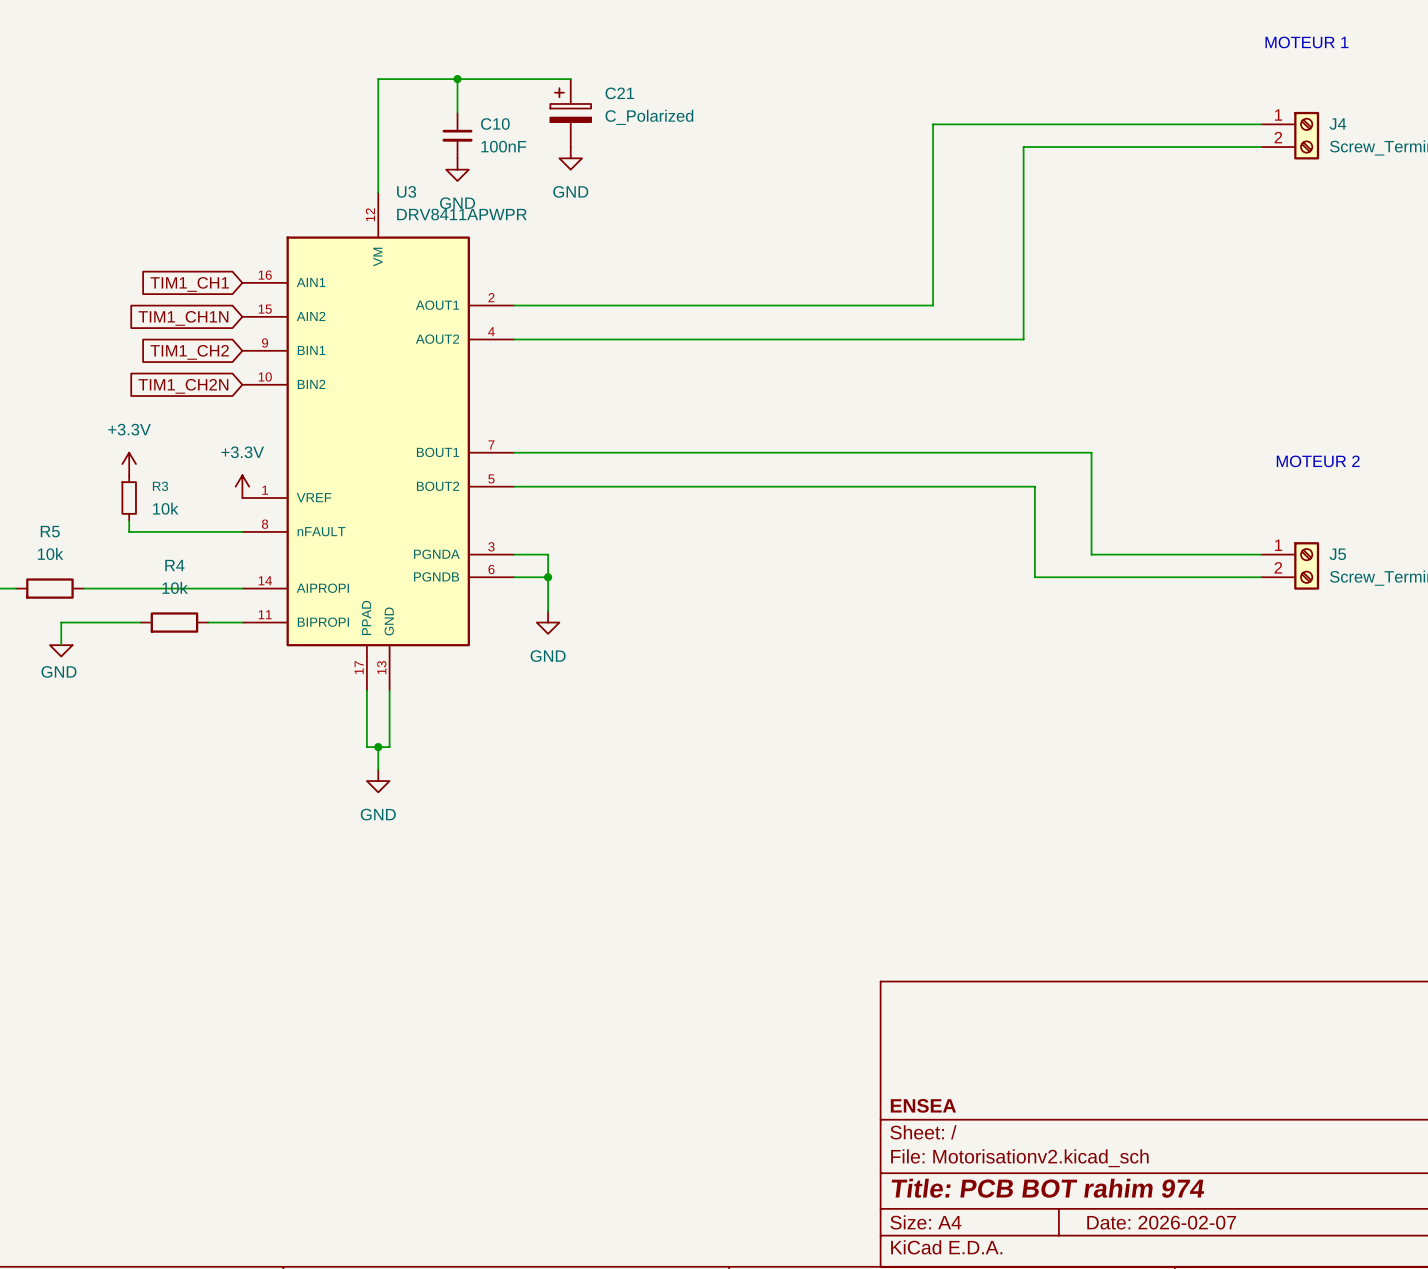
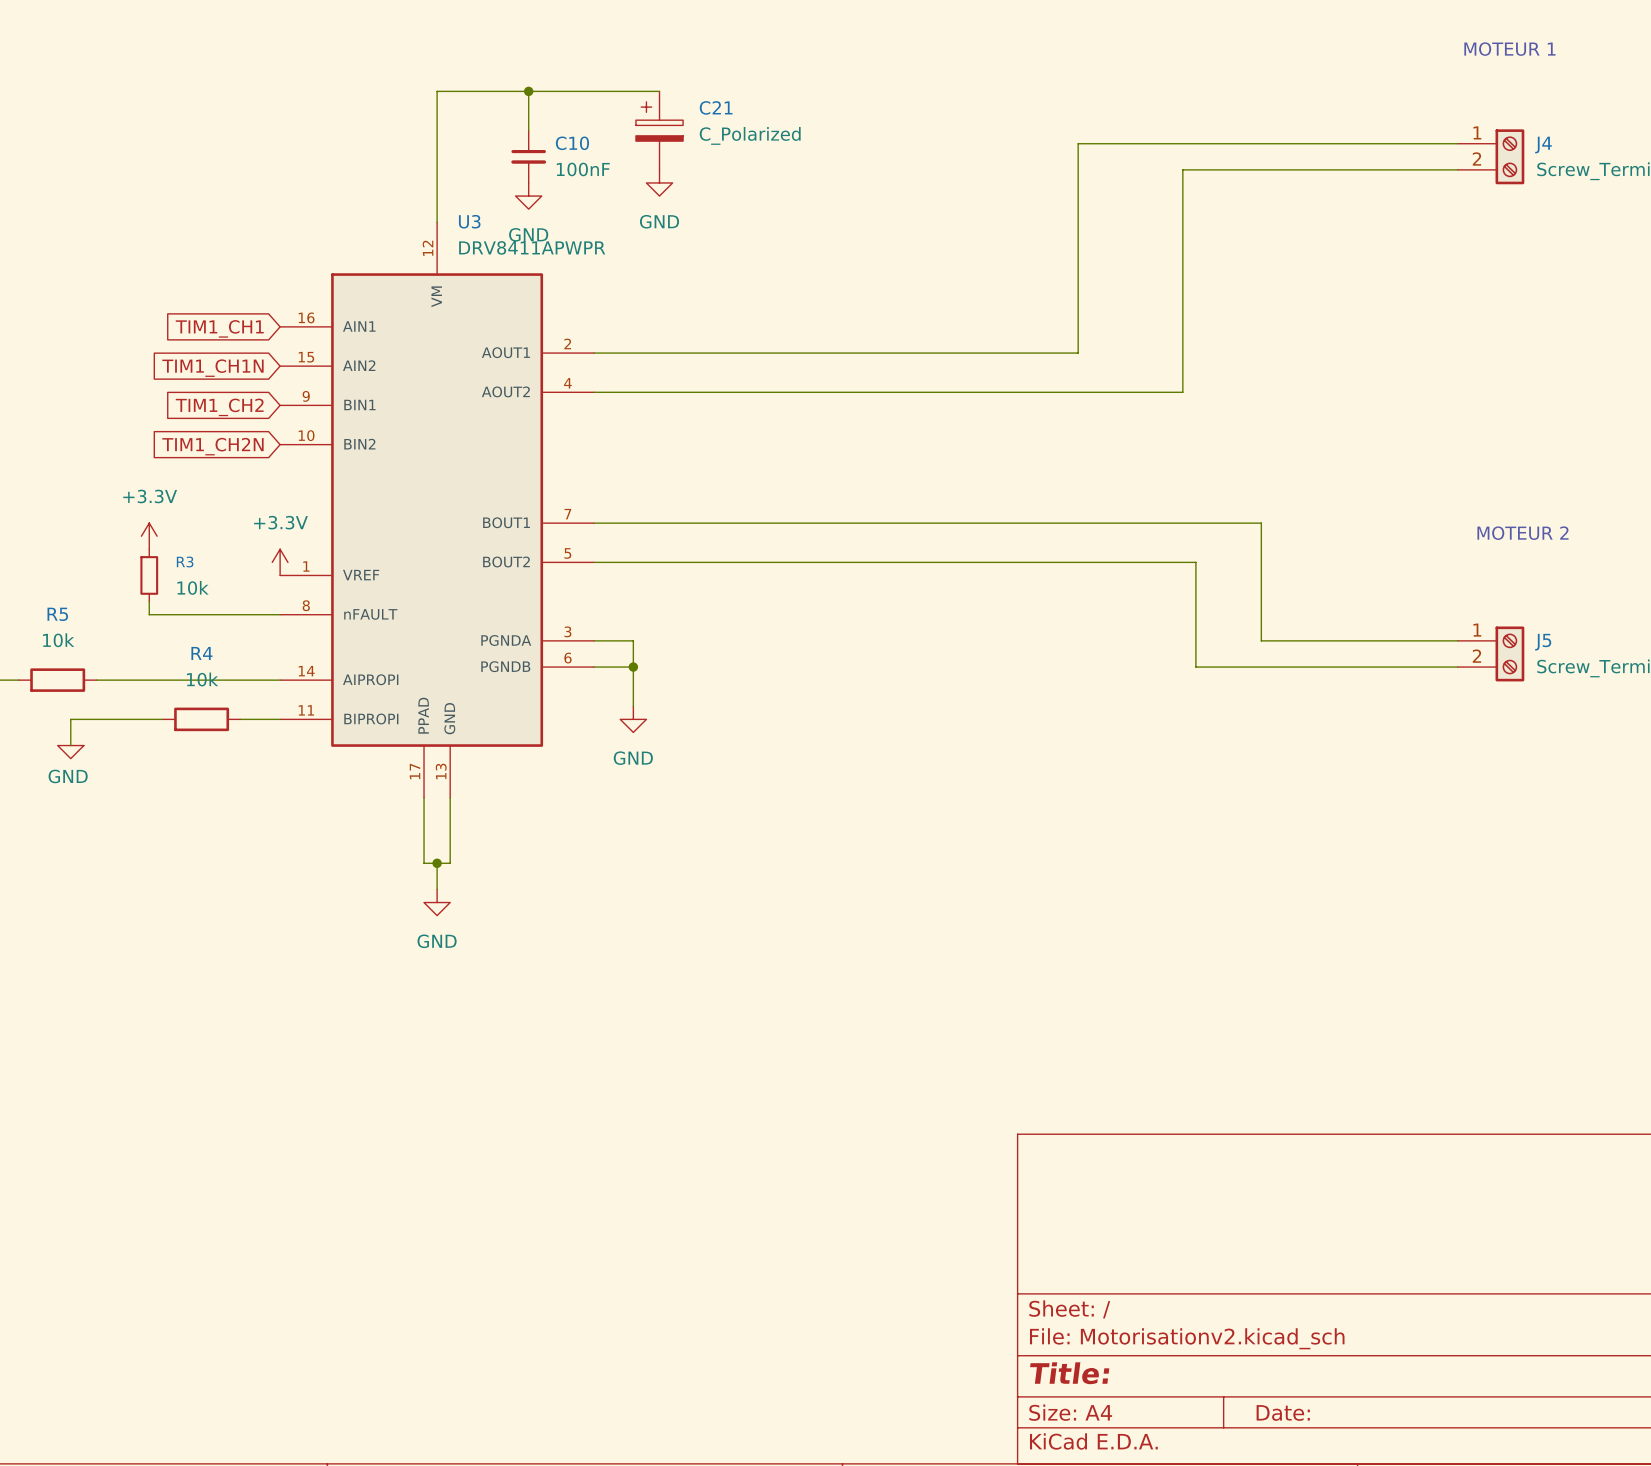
title block: ENSEA (923, 1105) -> none
title block: Title: PCB BOT rahim 974 (1047, 1188) -> Title: (1069, 1373)
title block: Date: 2026-02-07 (1161, 1222) -> Date: (1283, 1412)

